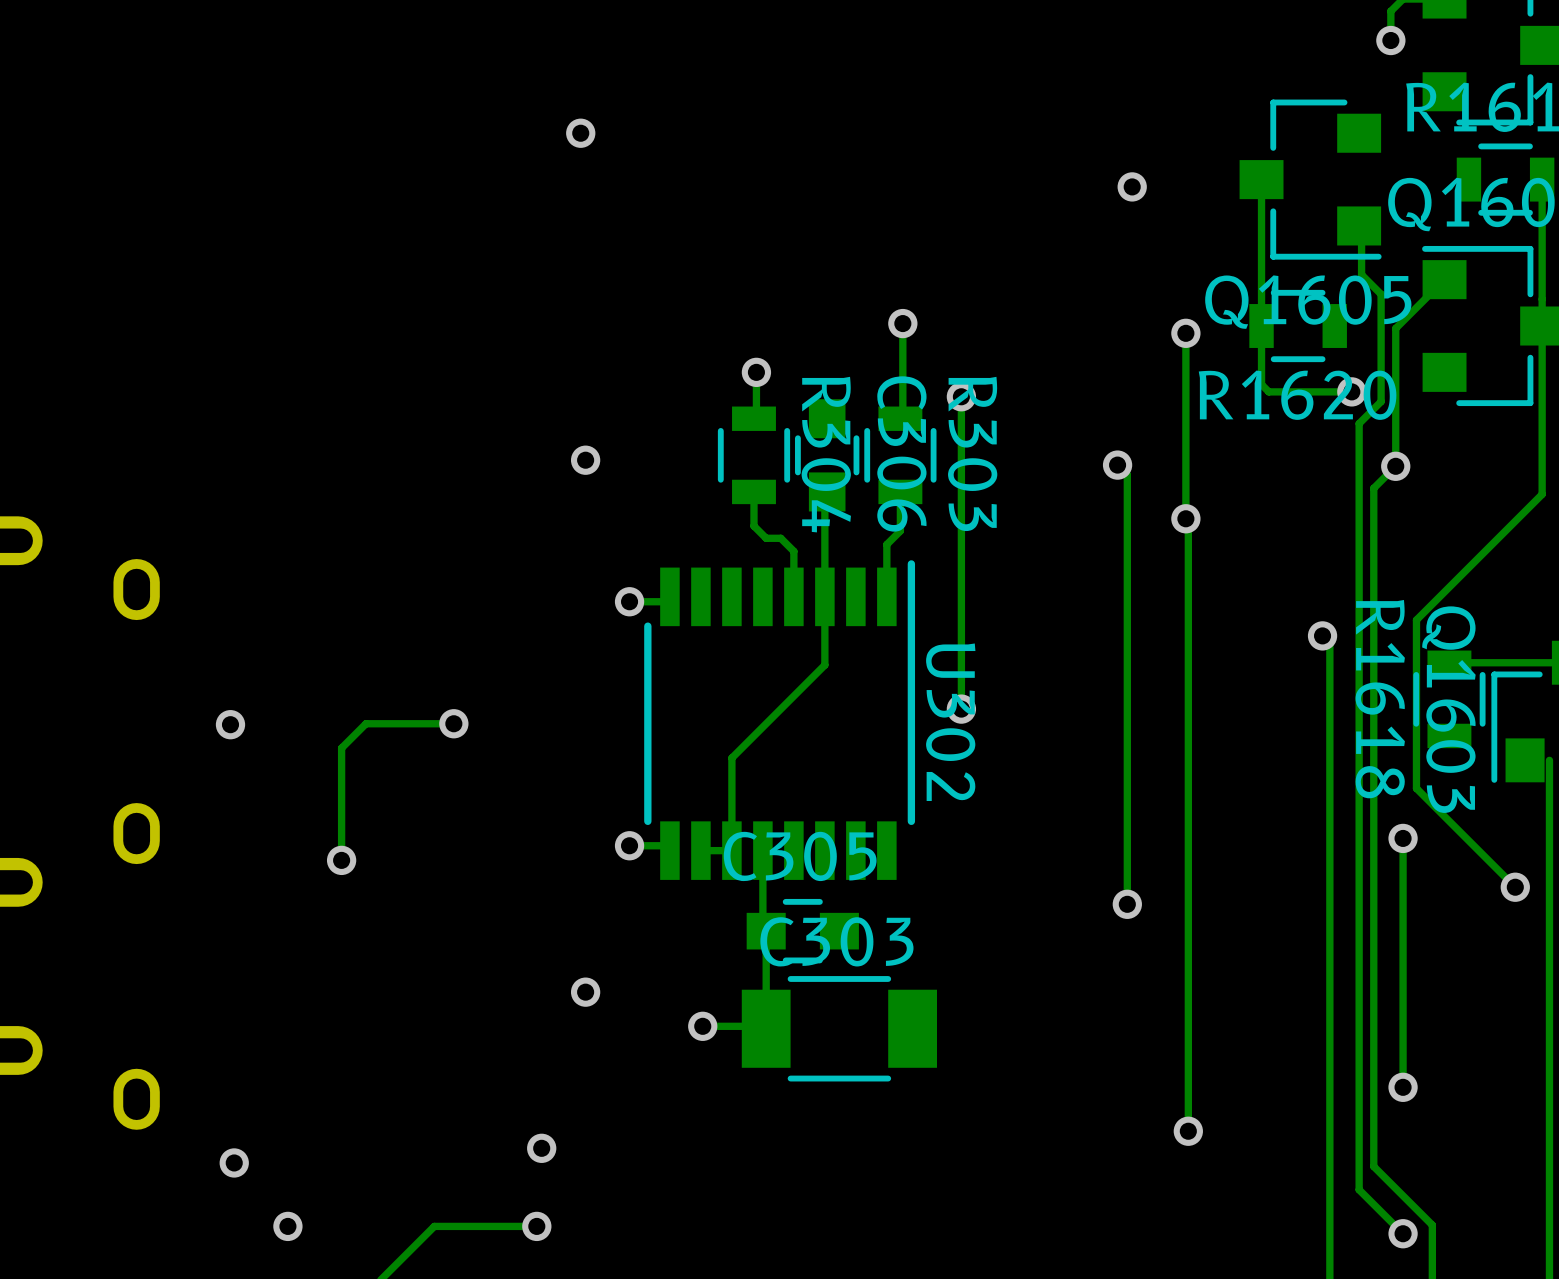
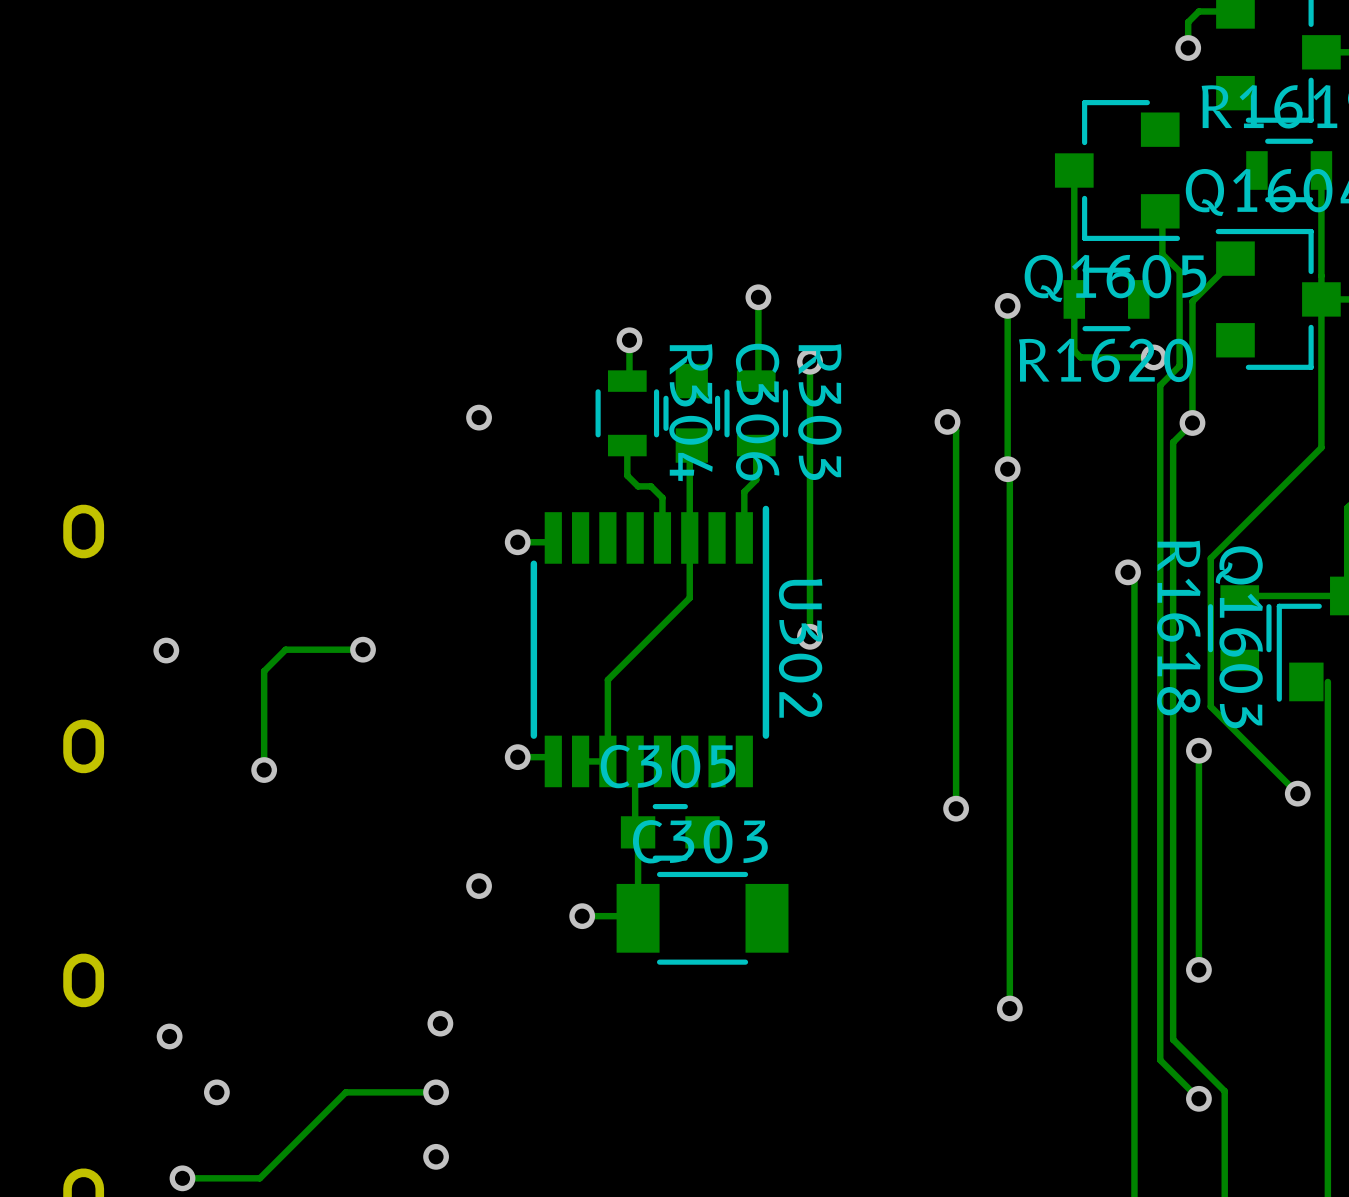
via: (580, 133) -> none
via: (1132, 186) -> none

